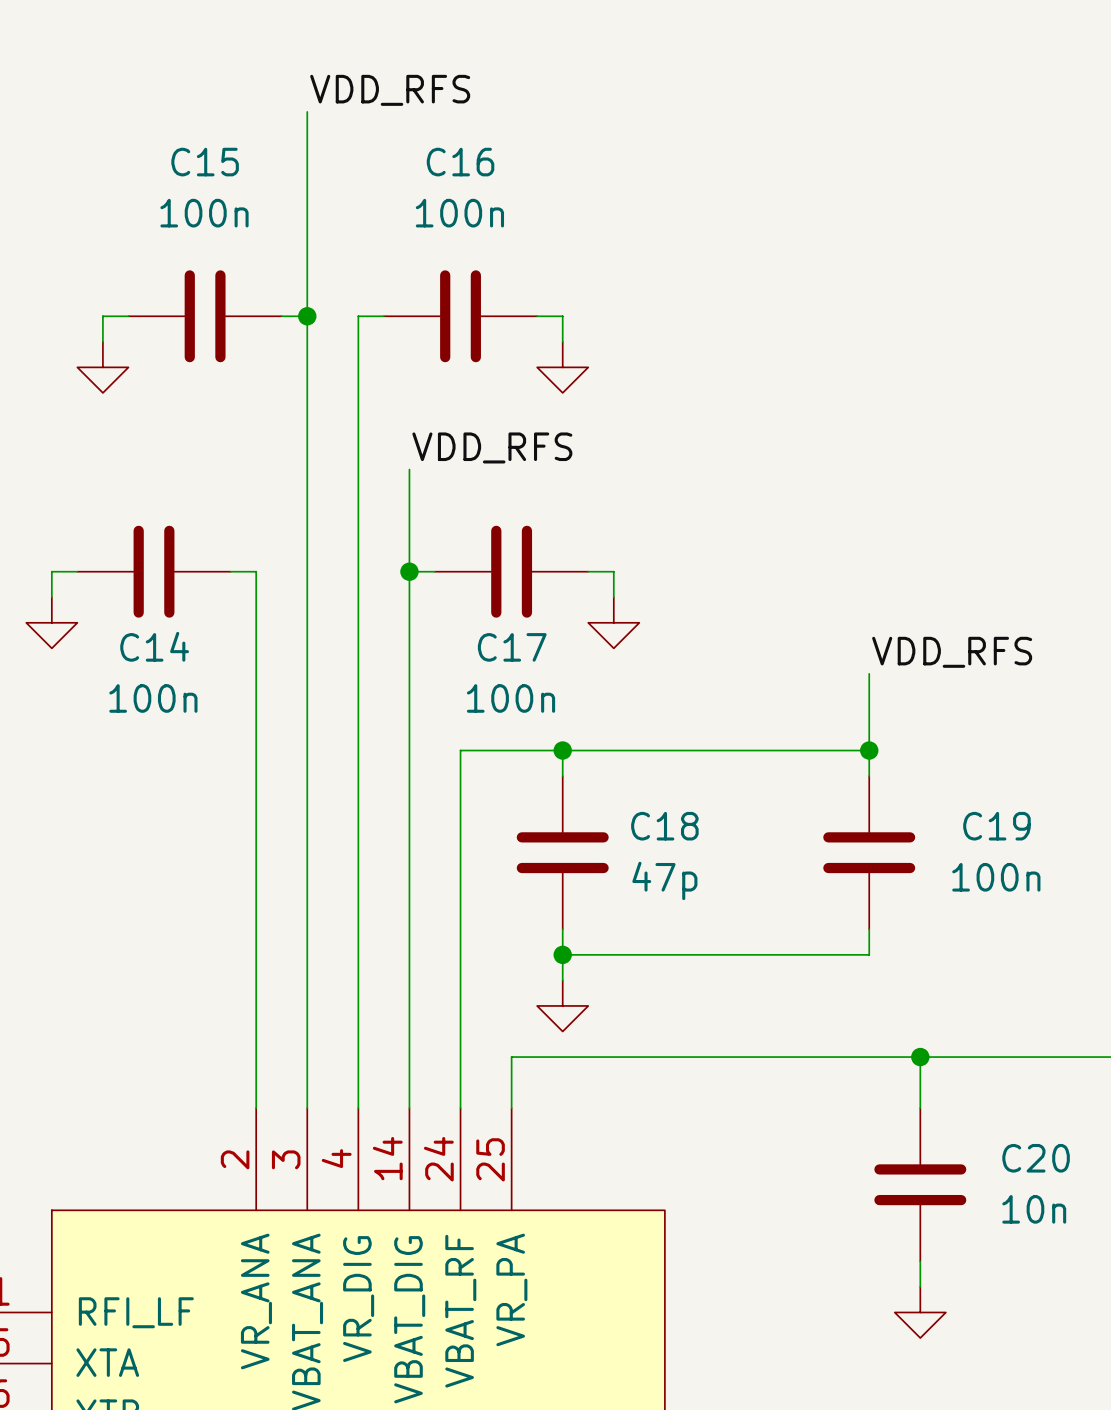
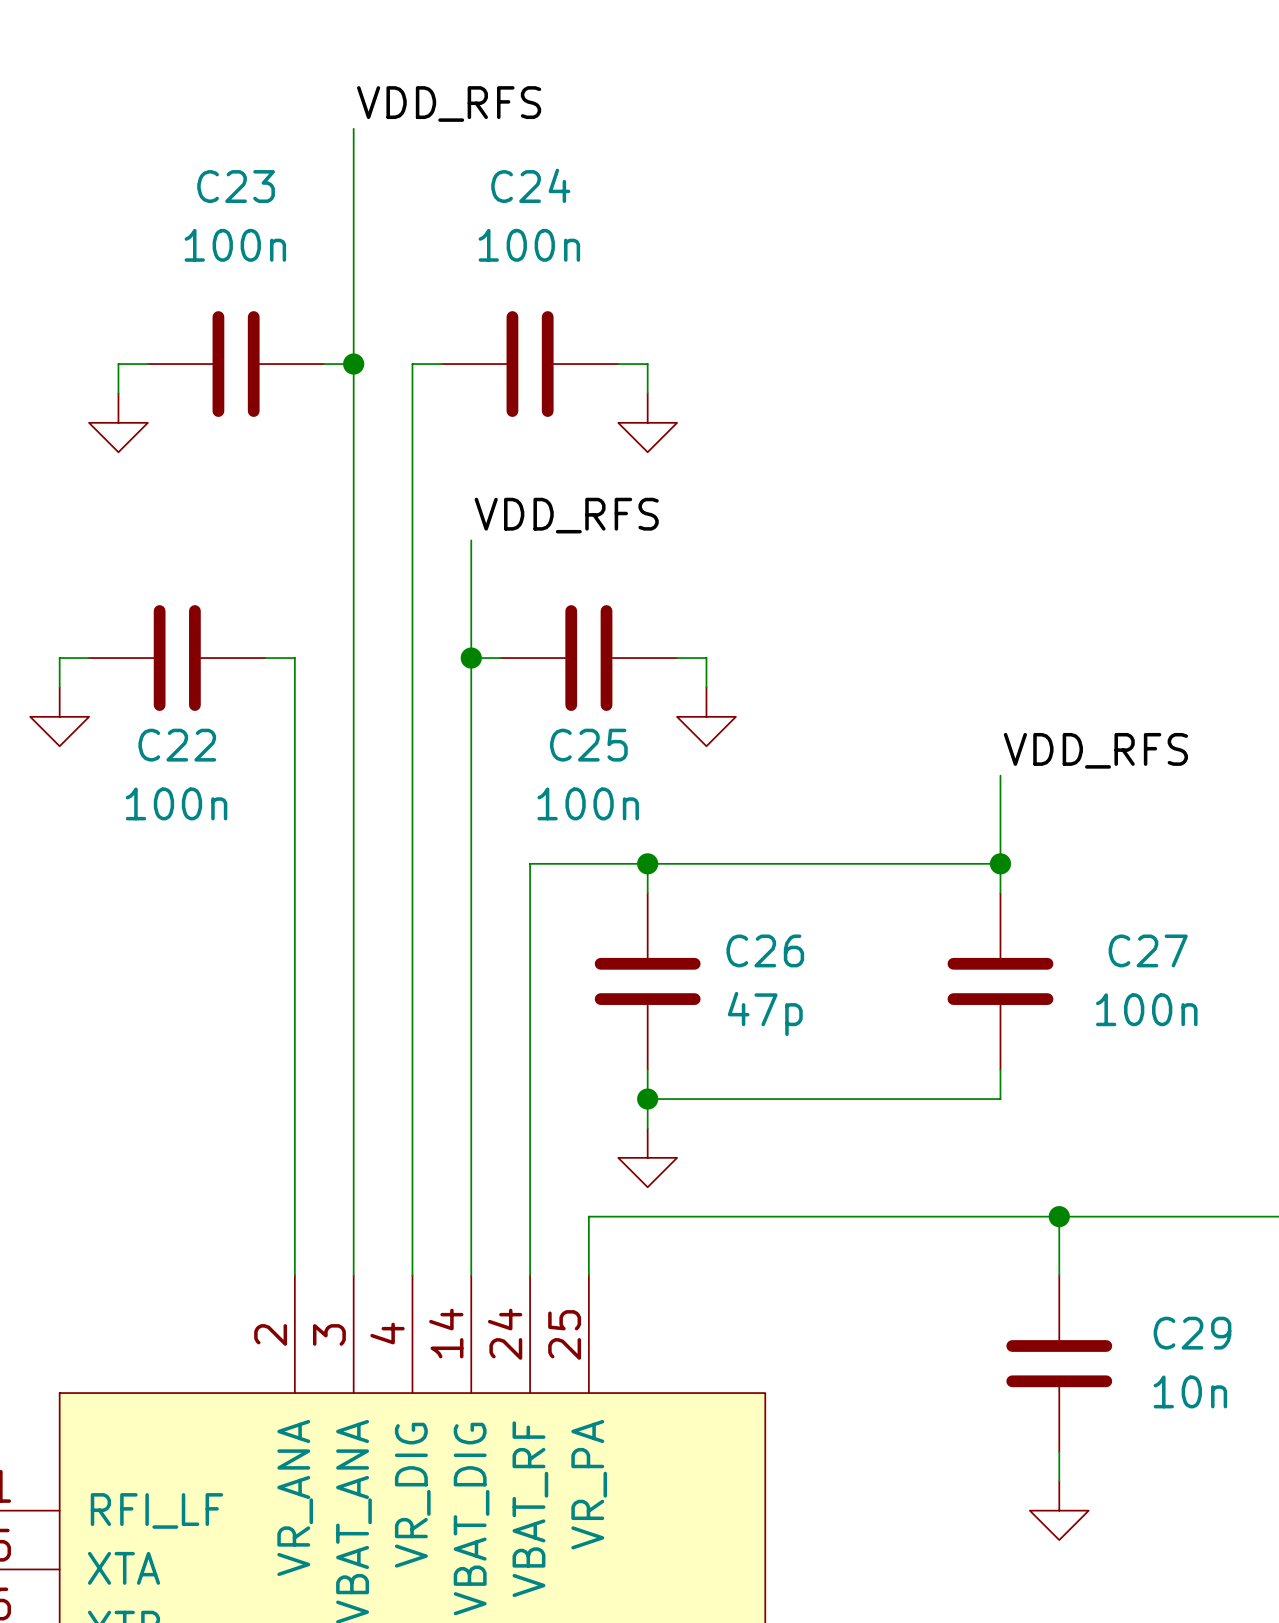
C15 name: C15 (205, 162) -> C23 (236, 186)
C16 name: C16 (460, 162) -> C24 (530, 185)
C14 name: C14 (154, 646) -> C22 (177, 745)
C17 name: C17 (512, 647) -> C25 (588, 745)
C18 name: C18 (664, 826) -> C26 (765, 950)
C19 name: C19 (996, 826) -> C27 (1148, 950)
C20 name: C20 (1036, 1158) -> C29 (1192, 1333)

